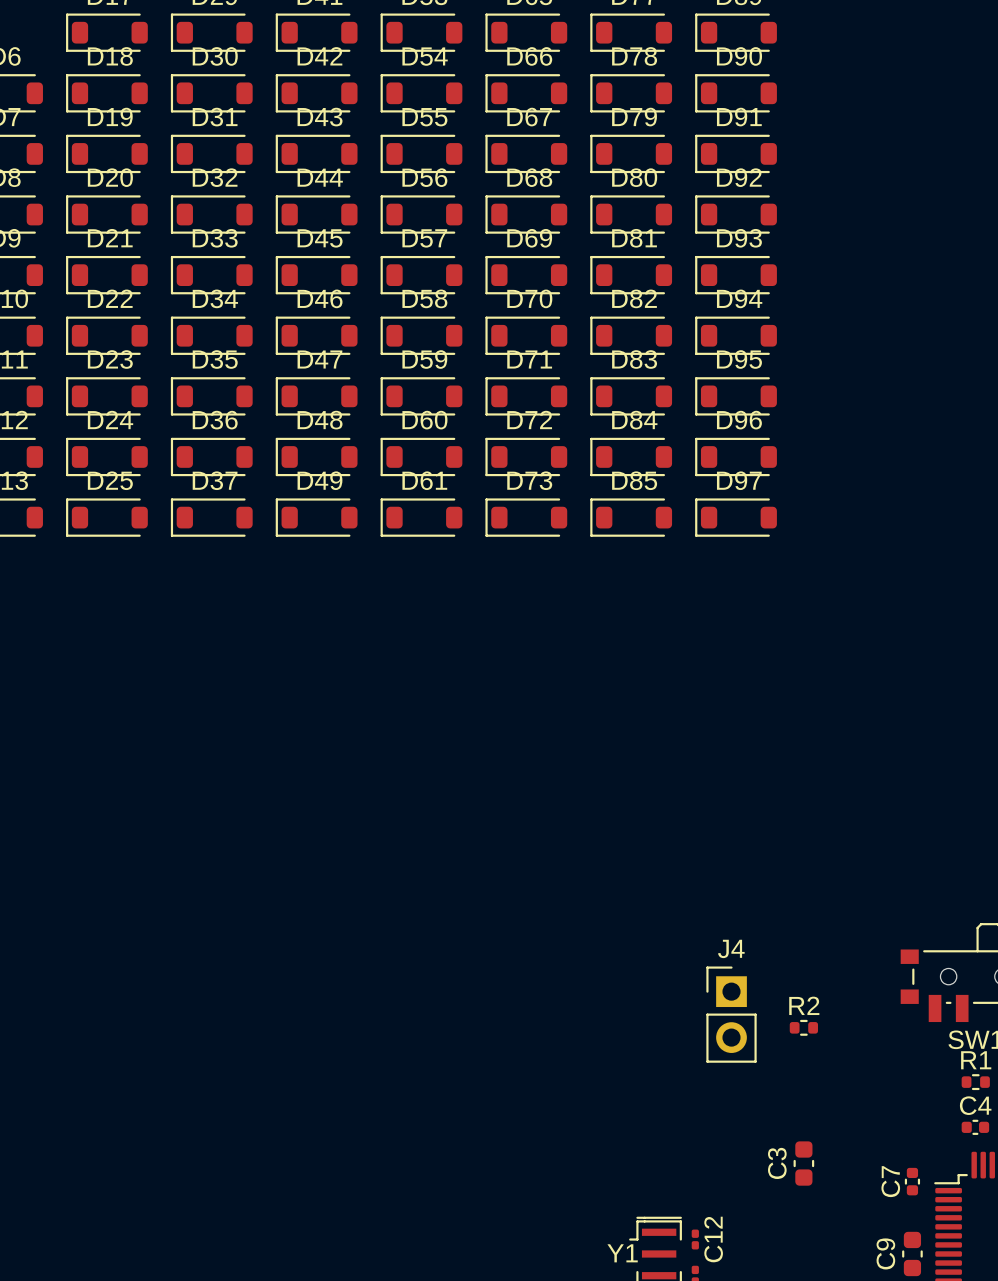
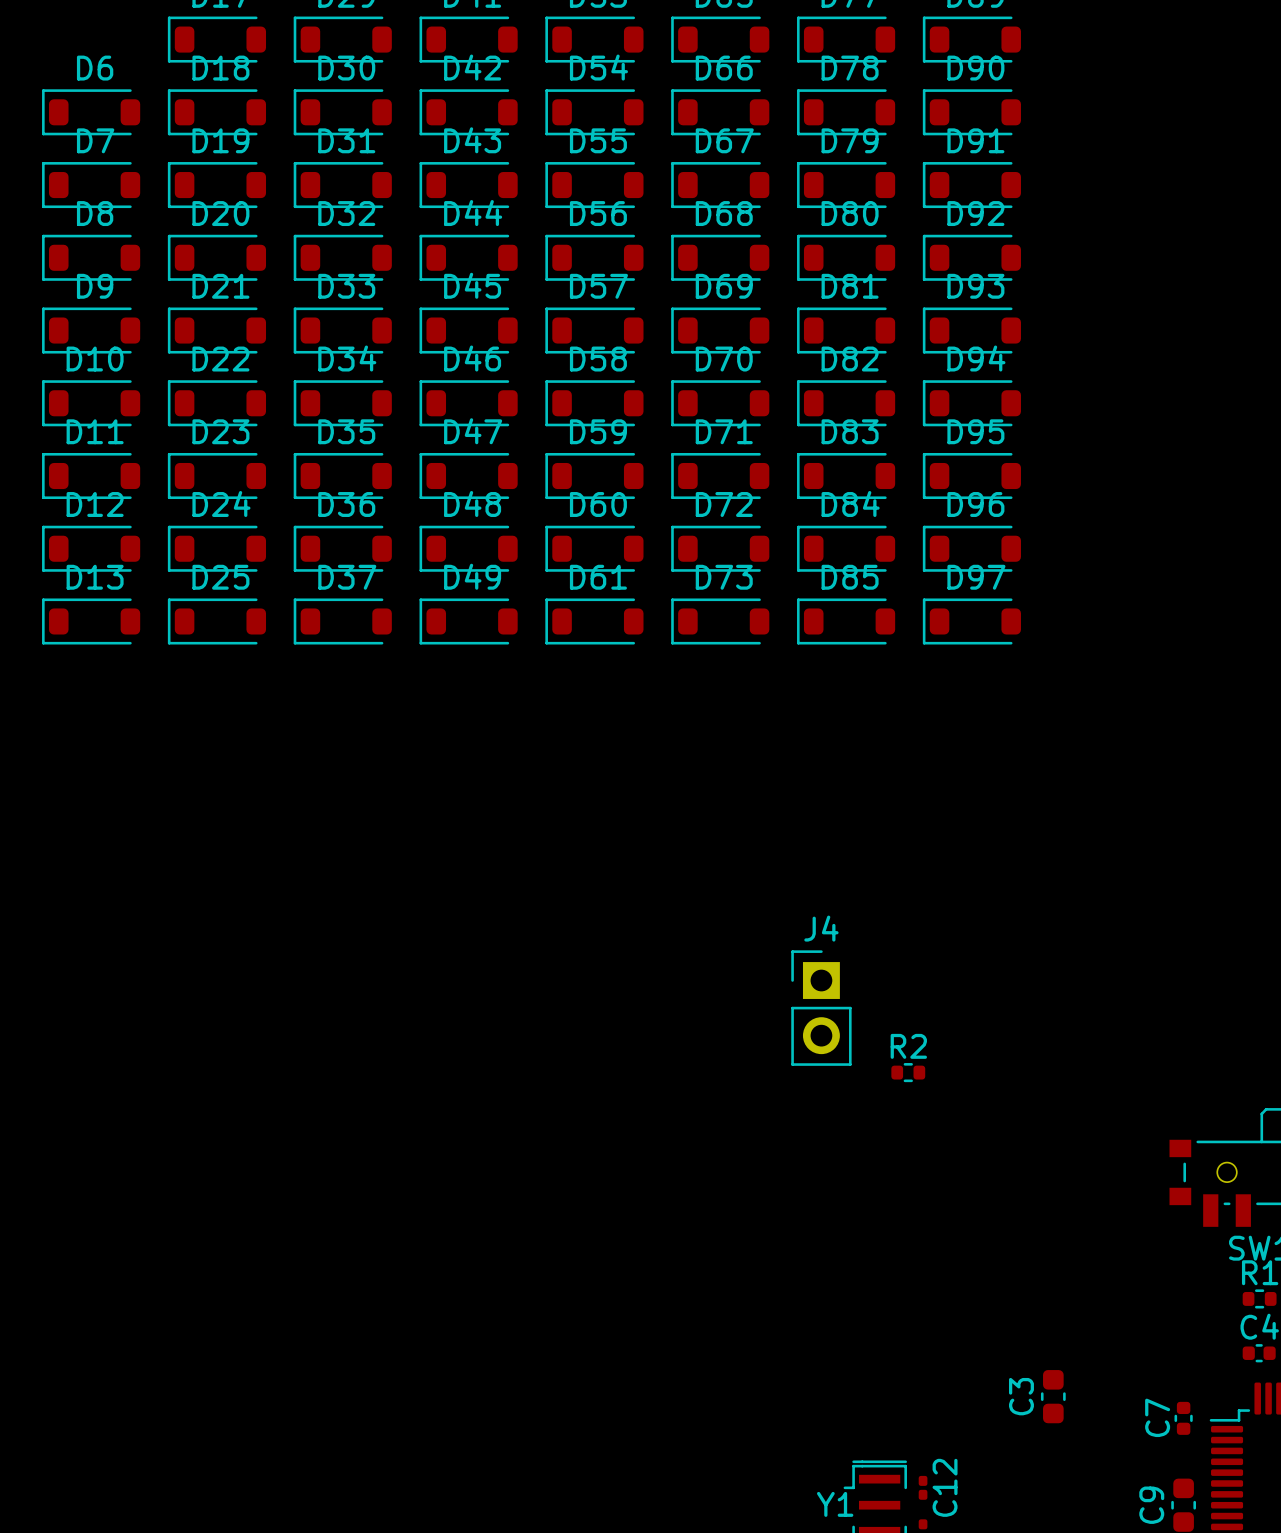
J4 position: (731, 1014) -> (821, 1008)
R2 position: (803, 1027) -> (908, 1072)

